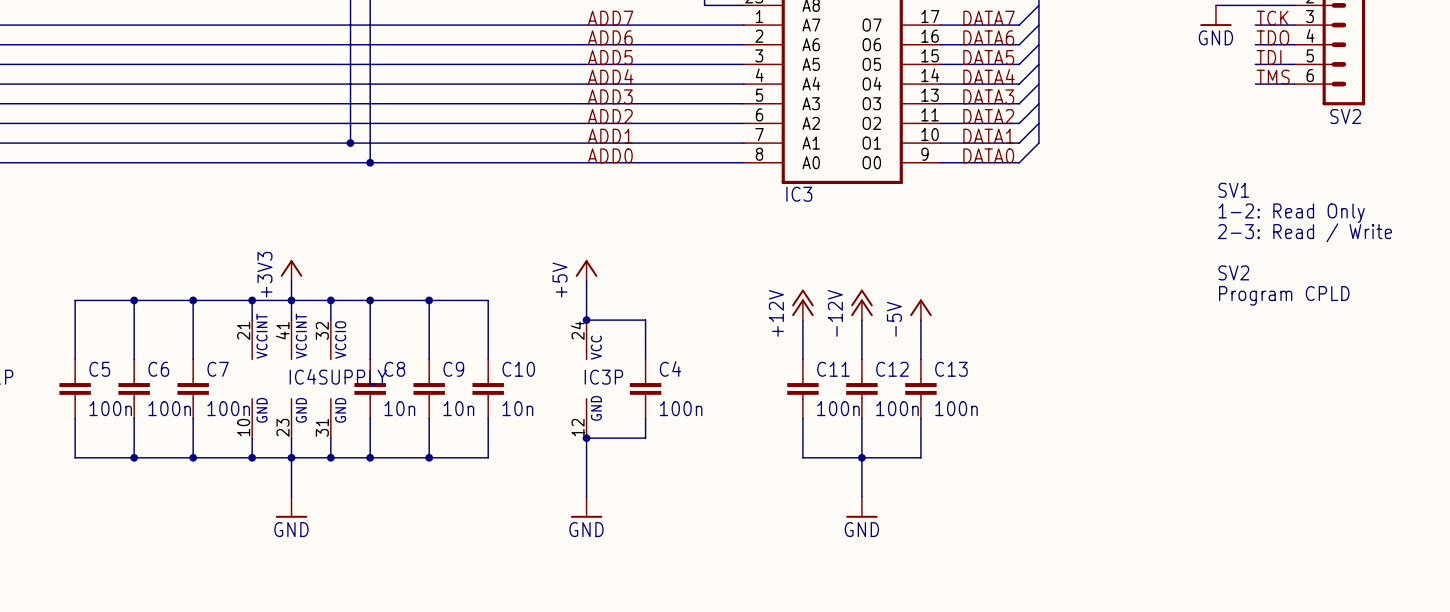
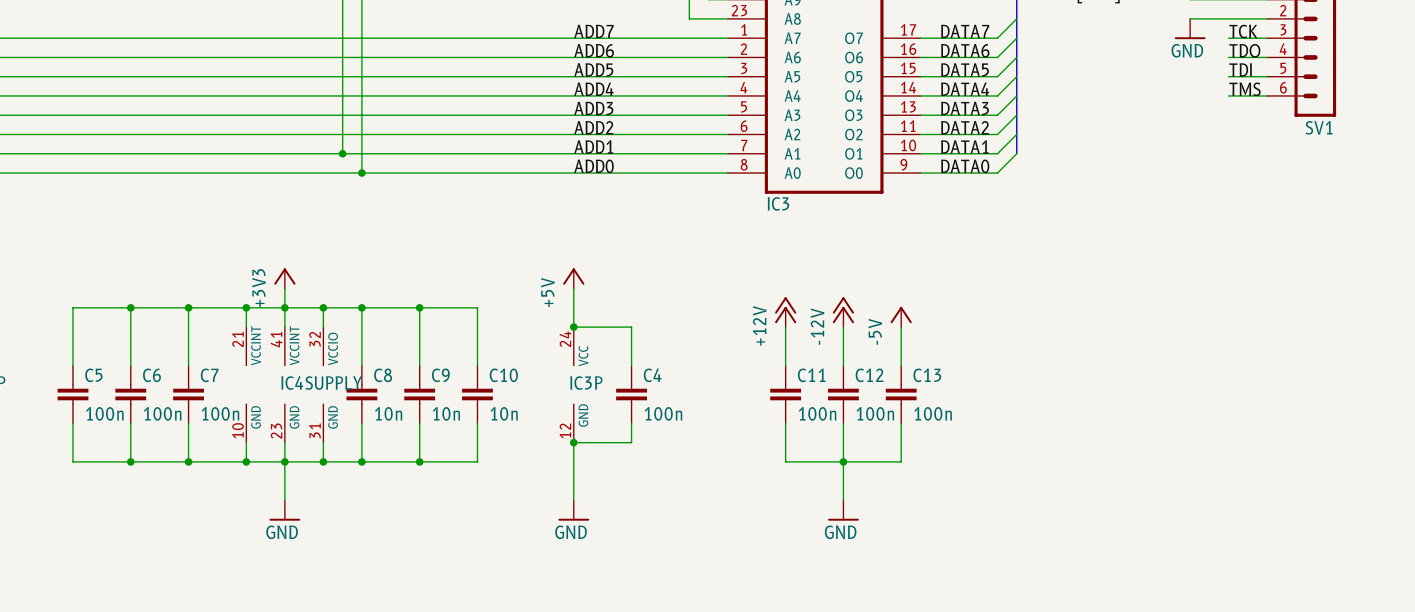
SV2 name: SV2 (1345, 116) -> SV1 (1319, 127)
text: SV1 (1233, 190) -> none
text: 1-2: Read Only (1291, 213) -> none
text: 2-3: Read / Write (1304, 232) -> none
text: SV2 (1233, 272) -> none
text: Program CPLD (1284, 295) -> none

